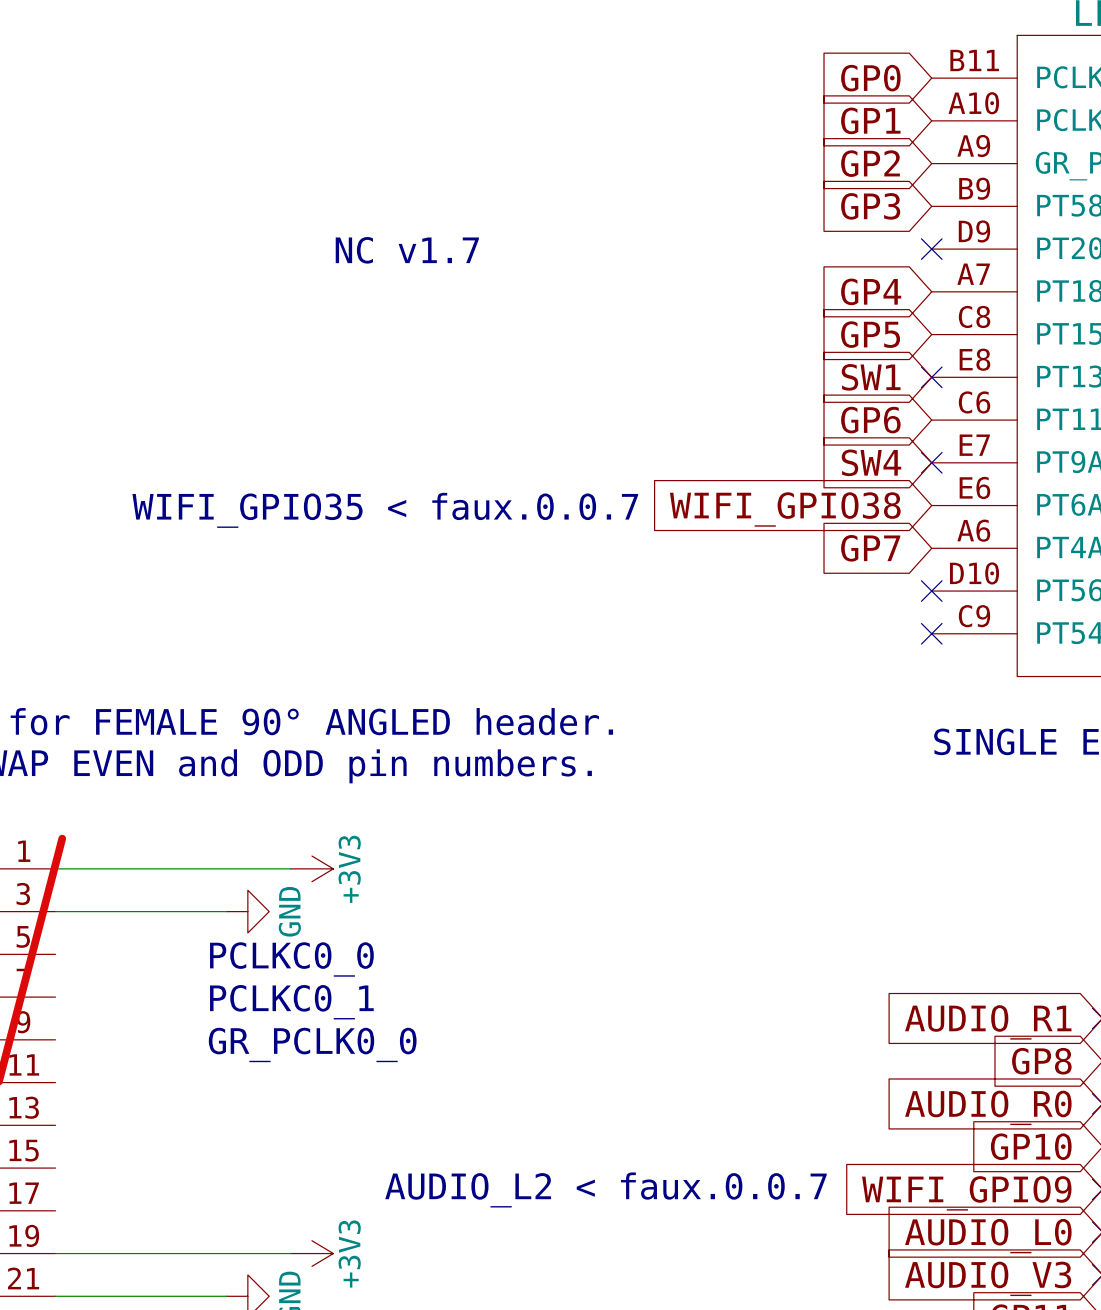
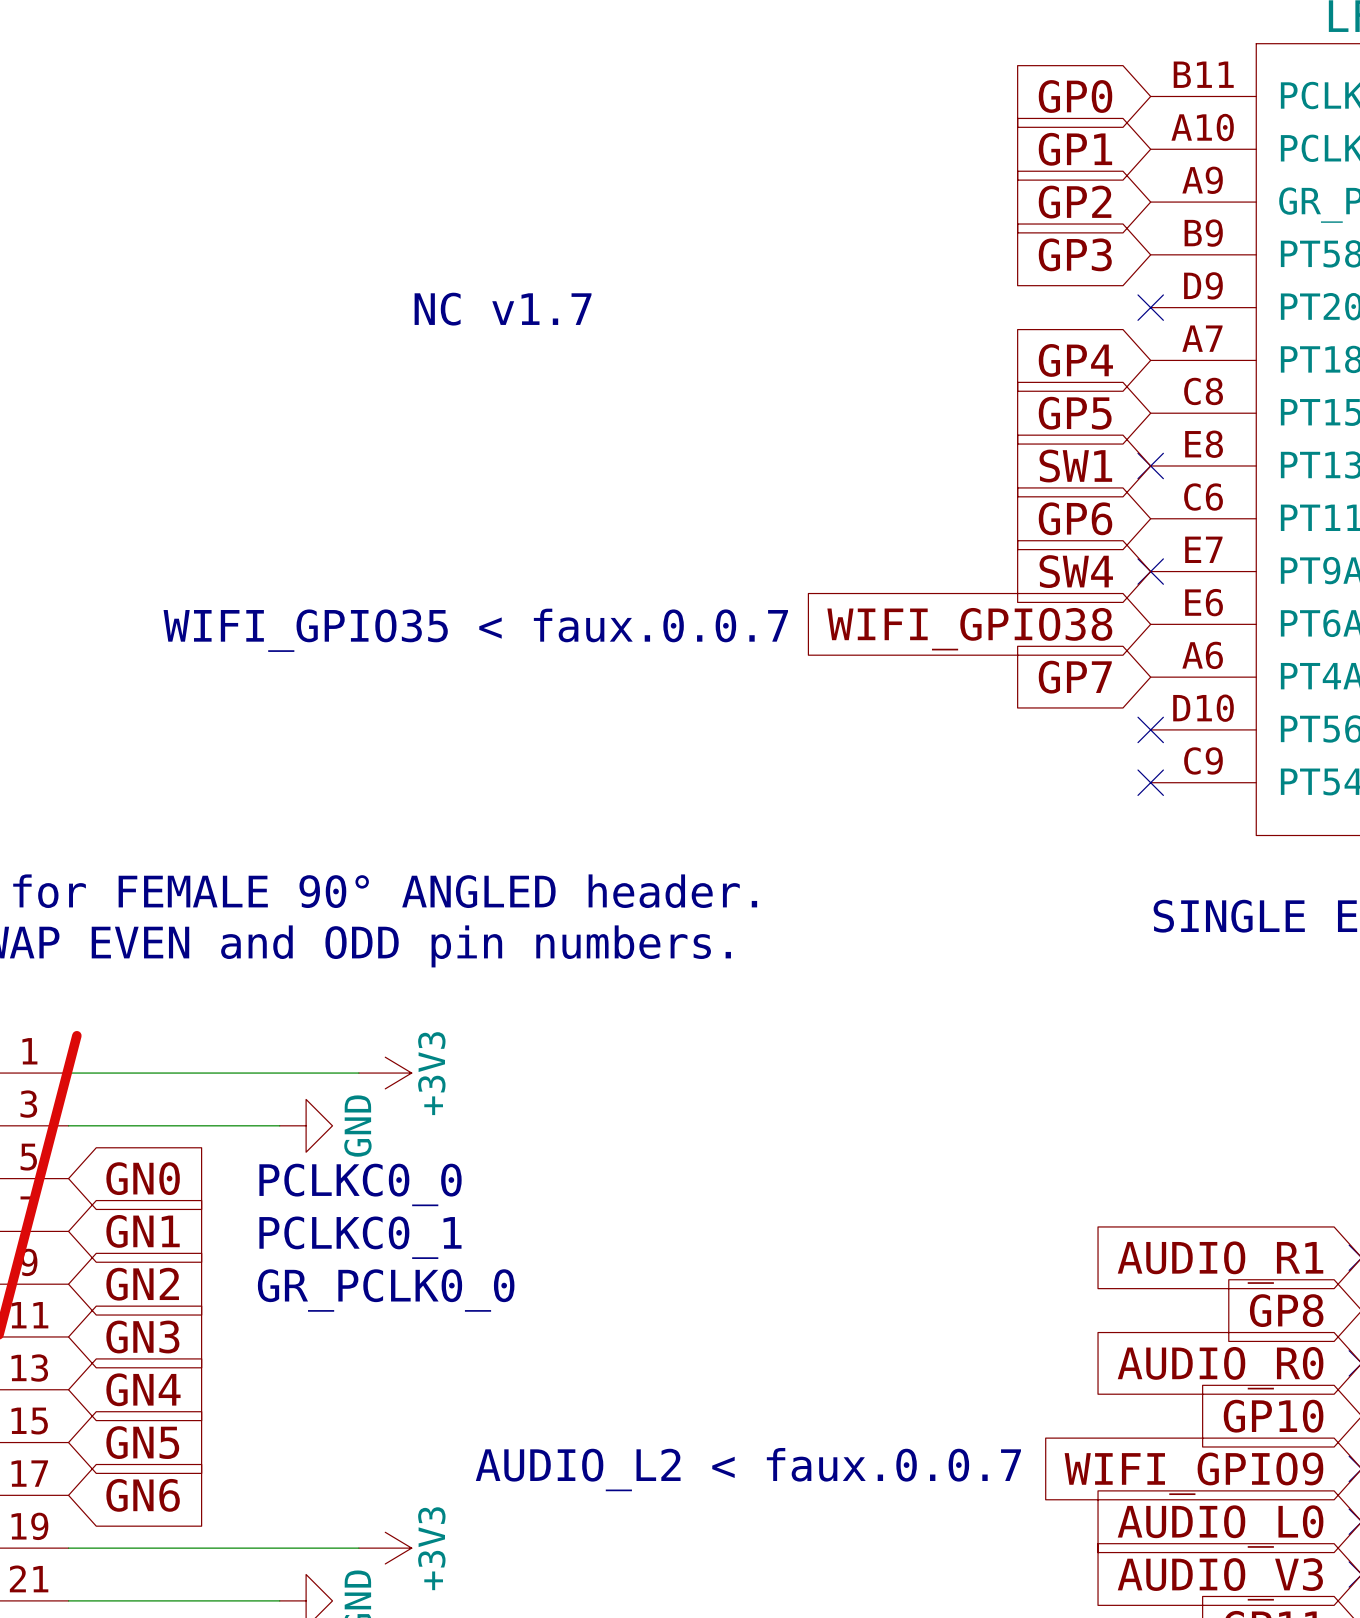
global label: none -> GN0 (143, 1178)
global label: none -> GN1 (143, 1231)
global label: none -> GN2 (142, 1284)
global label: none -> GN3 (142, 1337)
global label: none -> GN4 (143, 1389)
global label: none -> GN5 (142, 1442)
global label: none -> GN6 (143, 1495)

